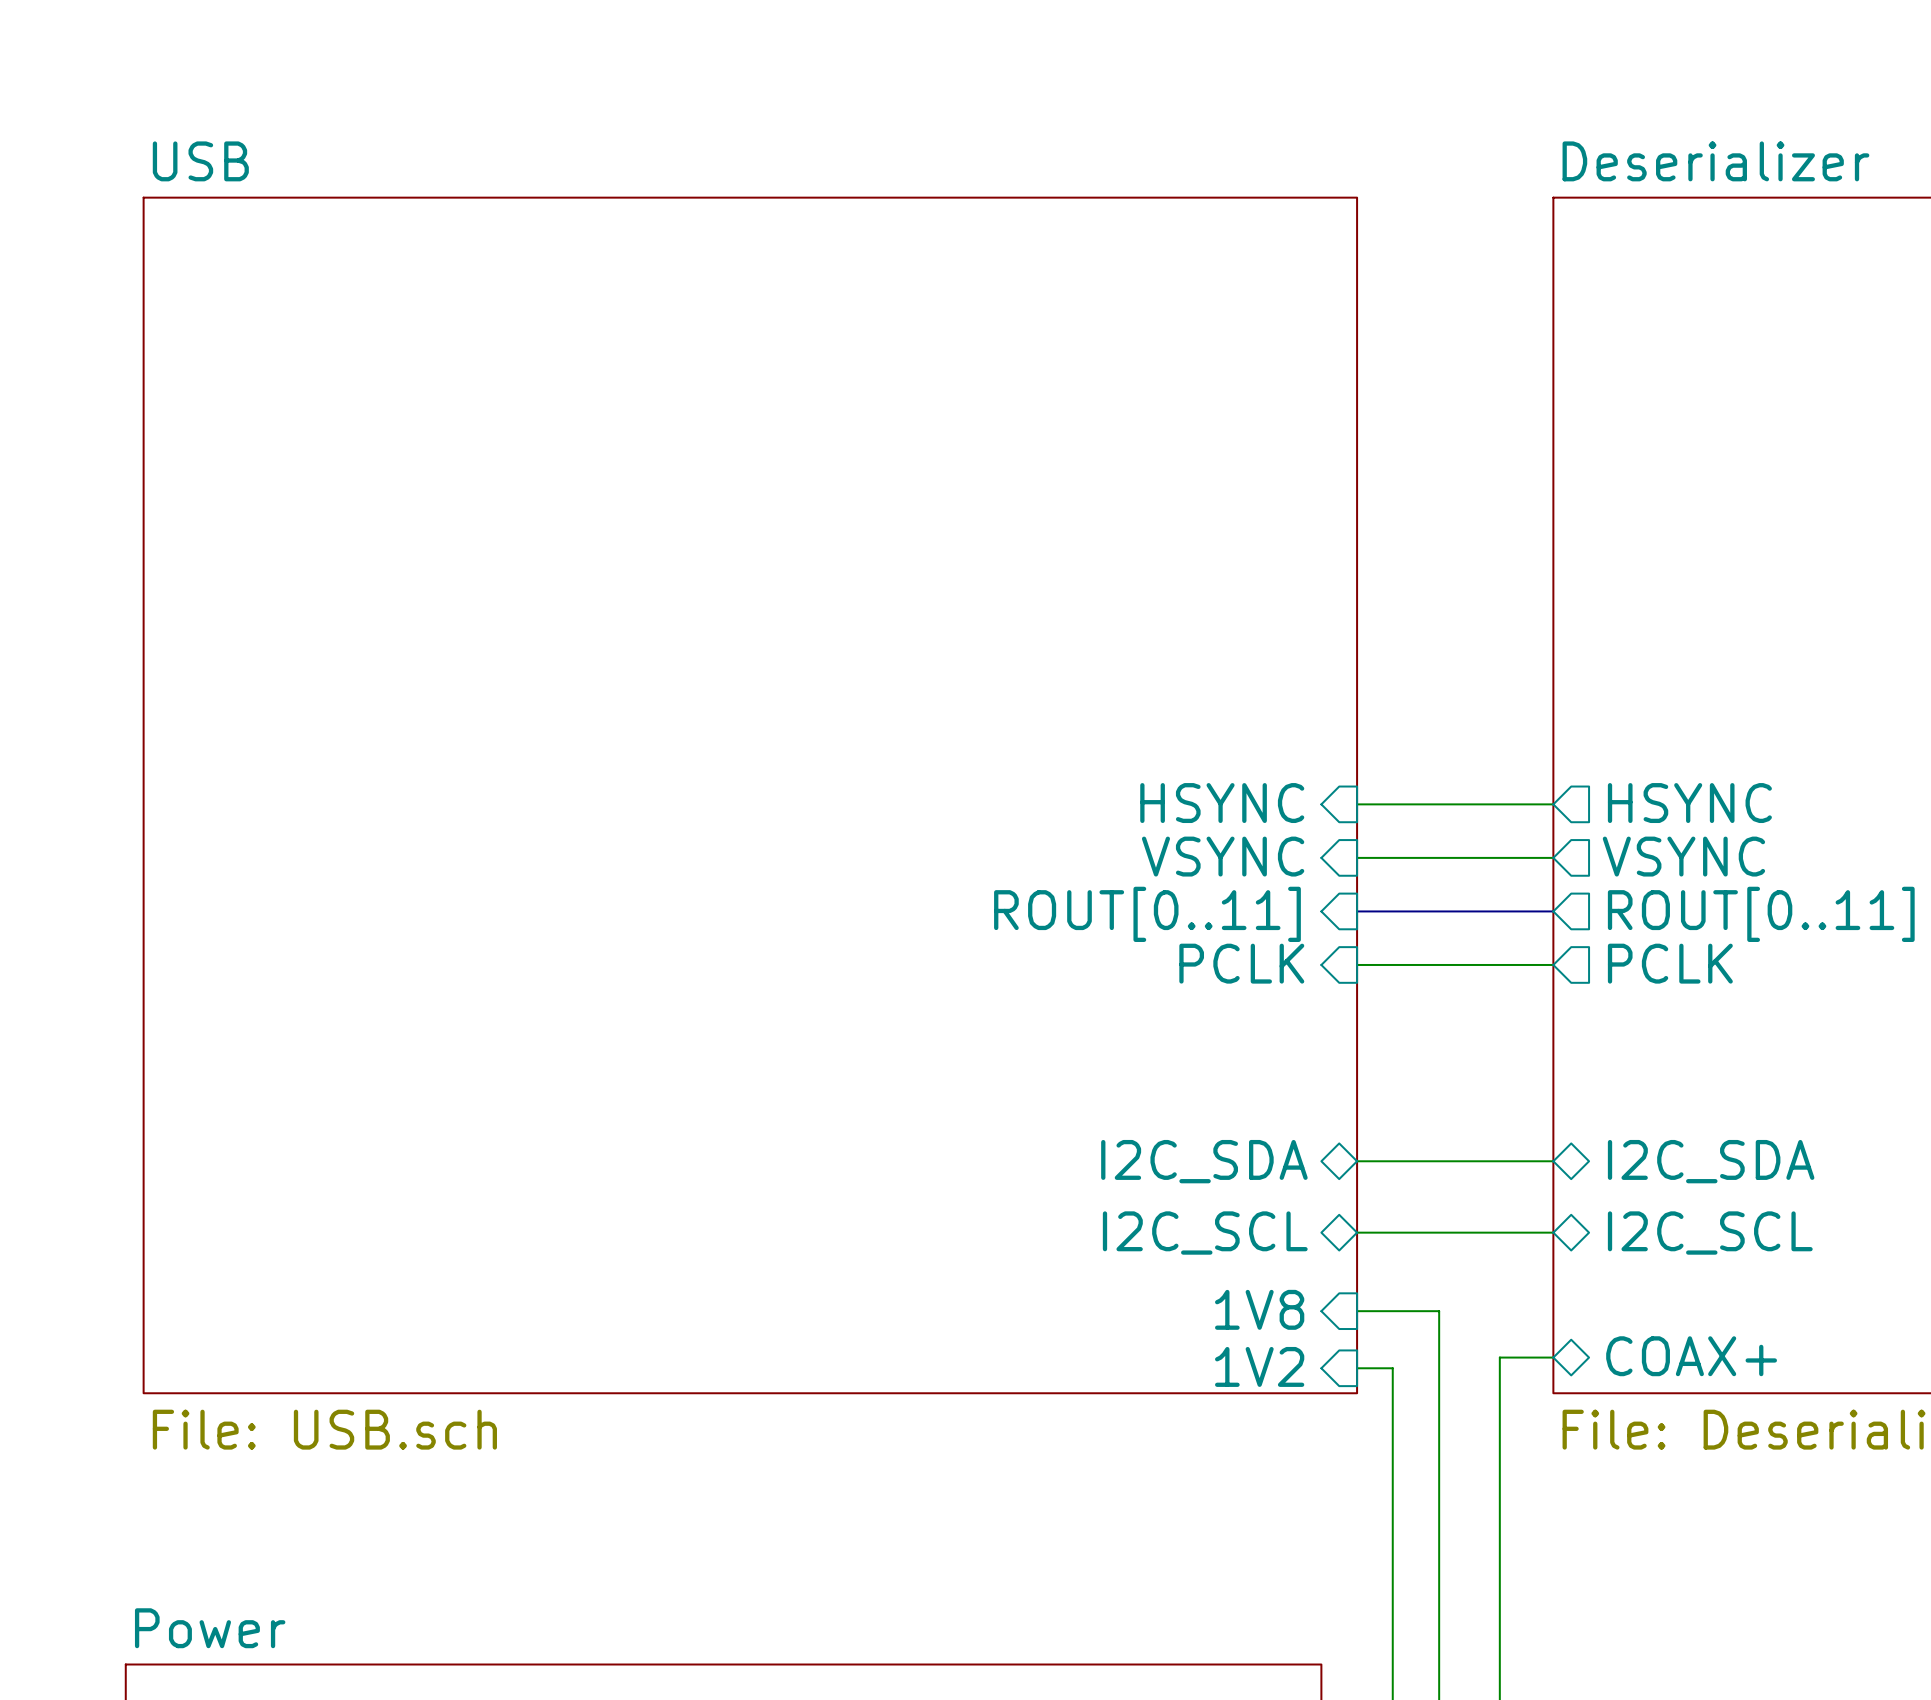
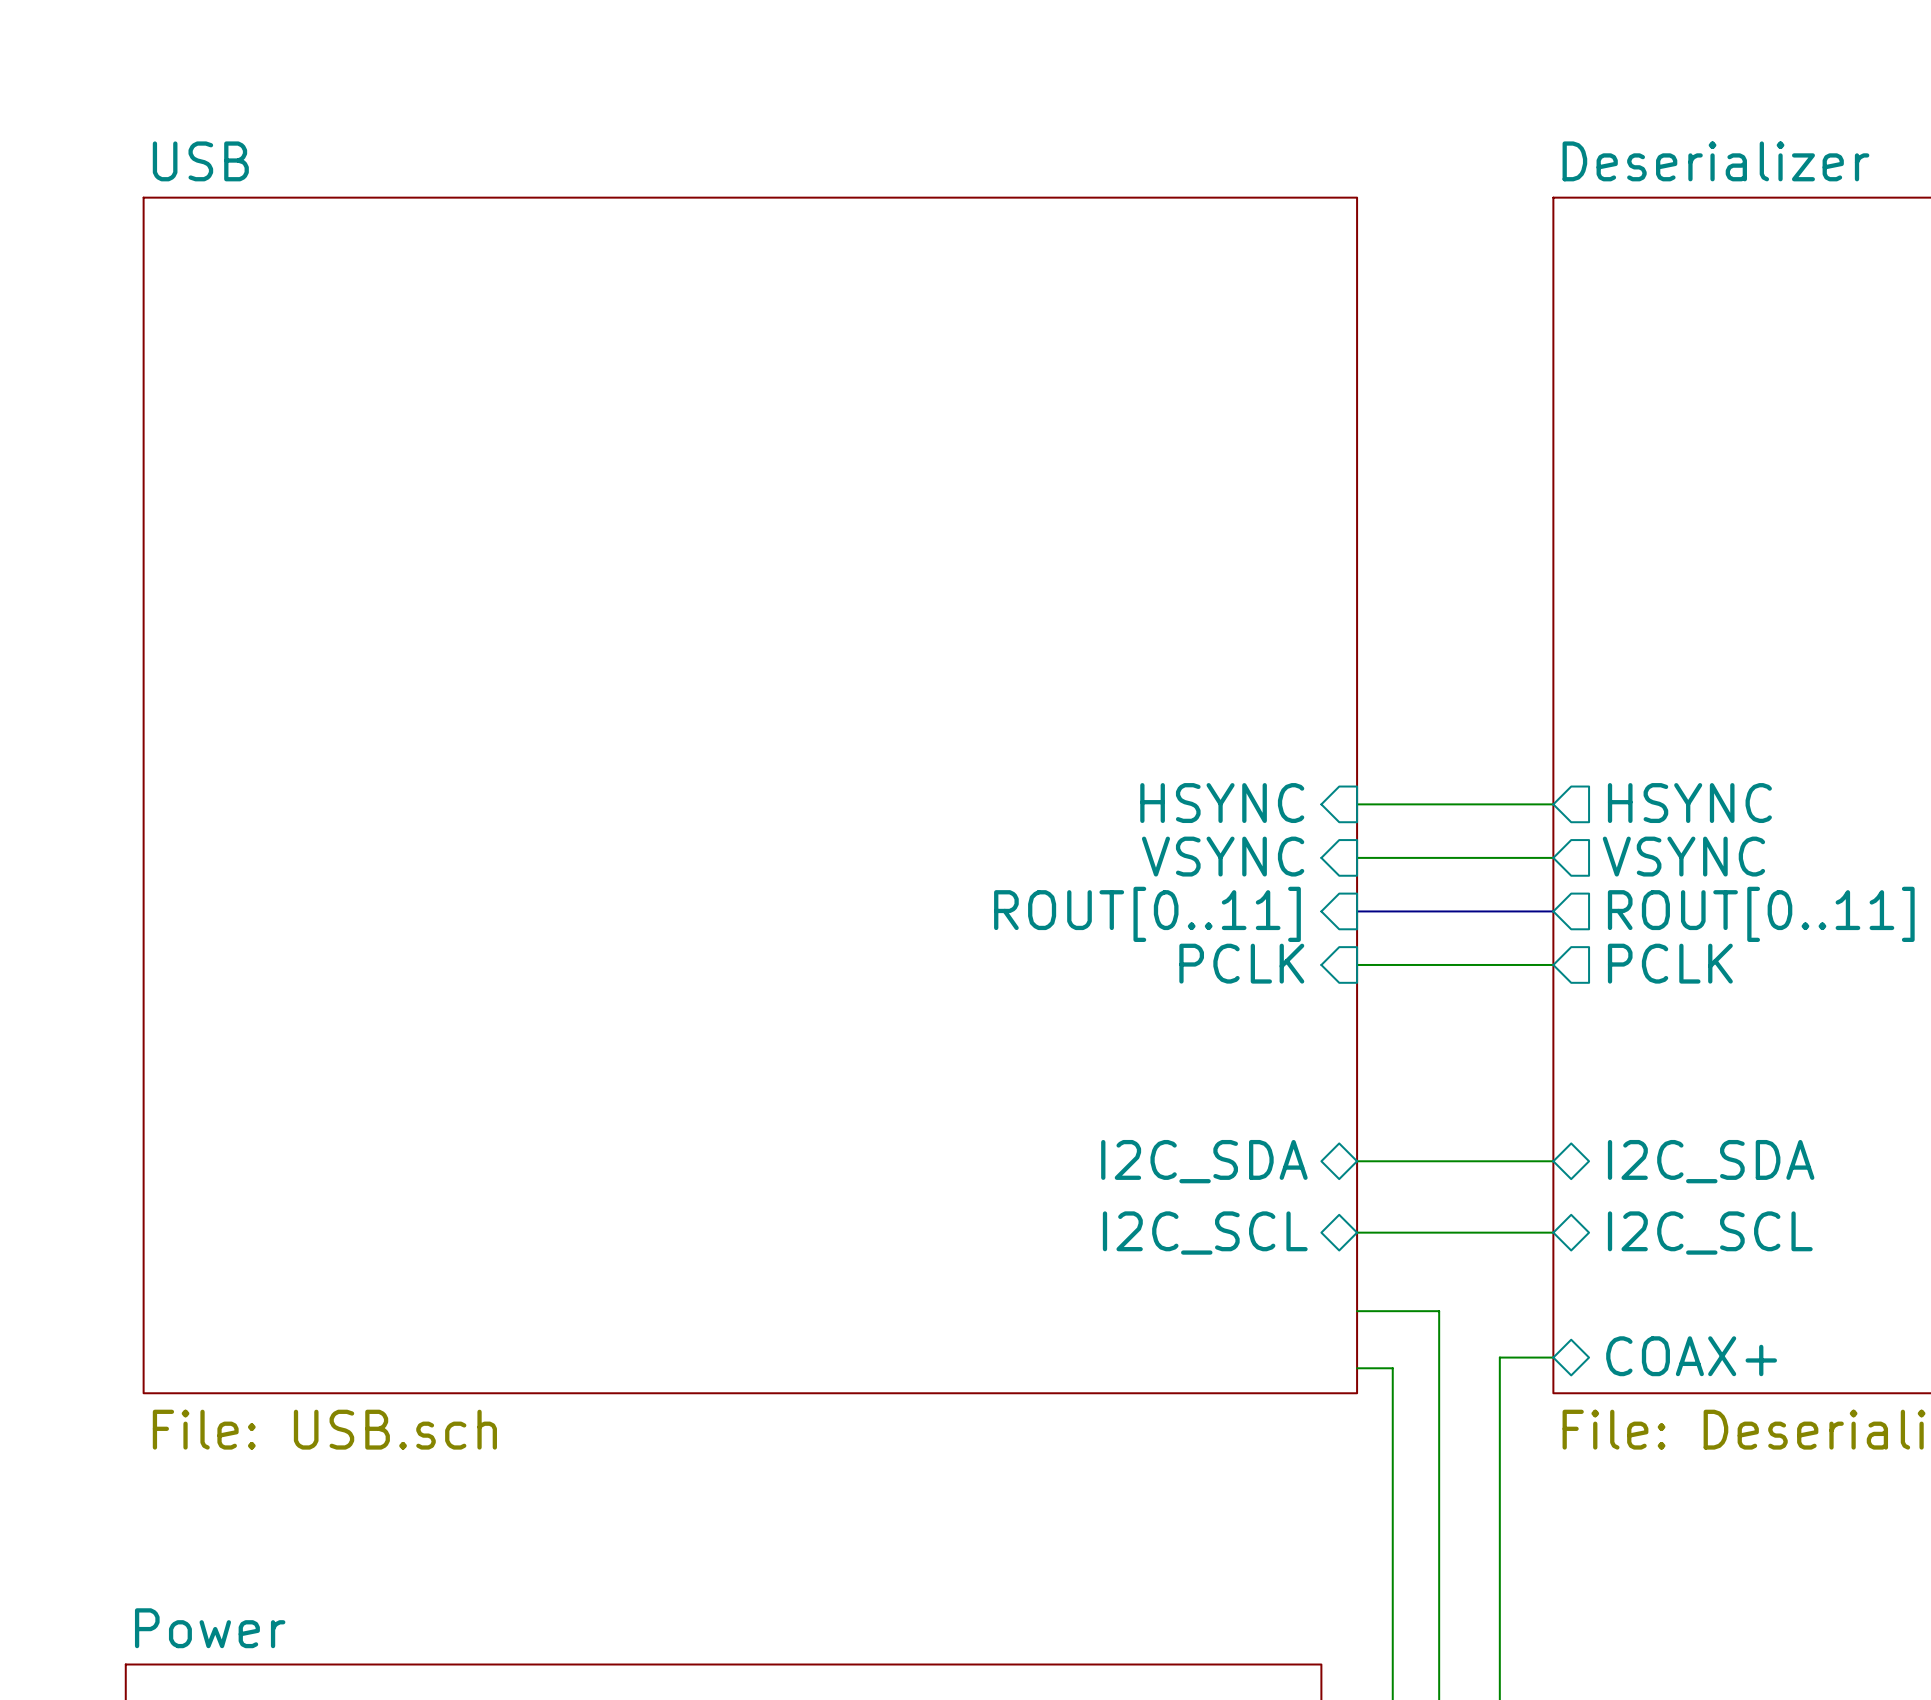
sheet pin: 1V8 (1259, 1309) -> none
sheet pin: 1V2 (1259, 1366) -> none

